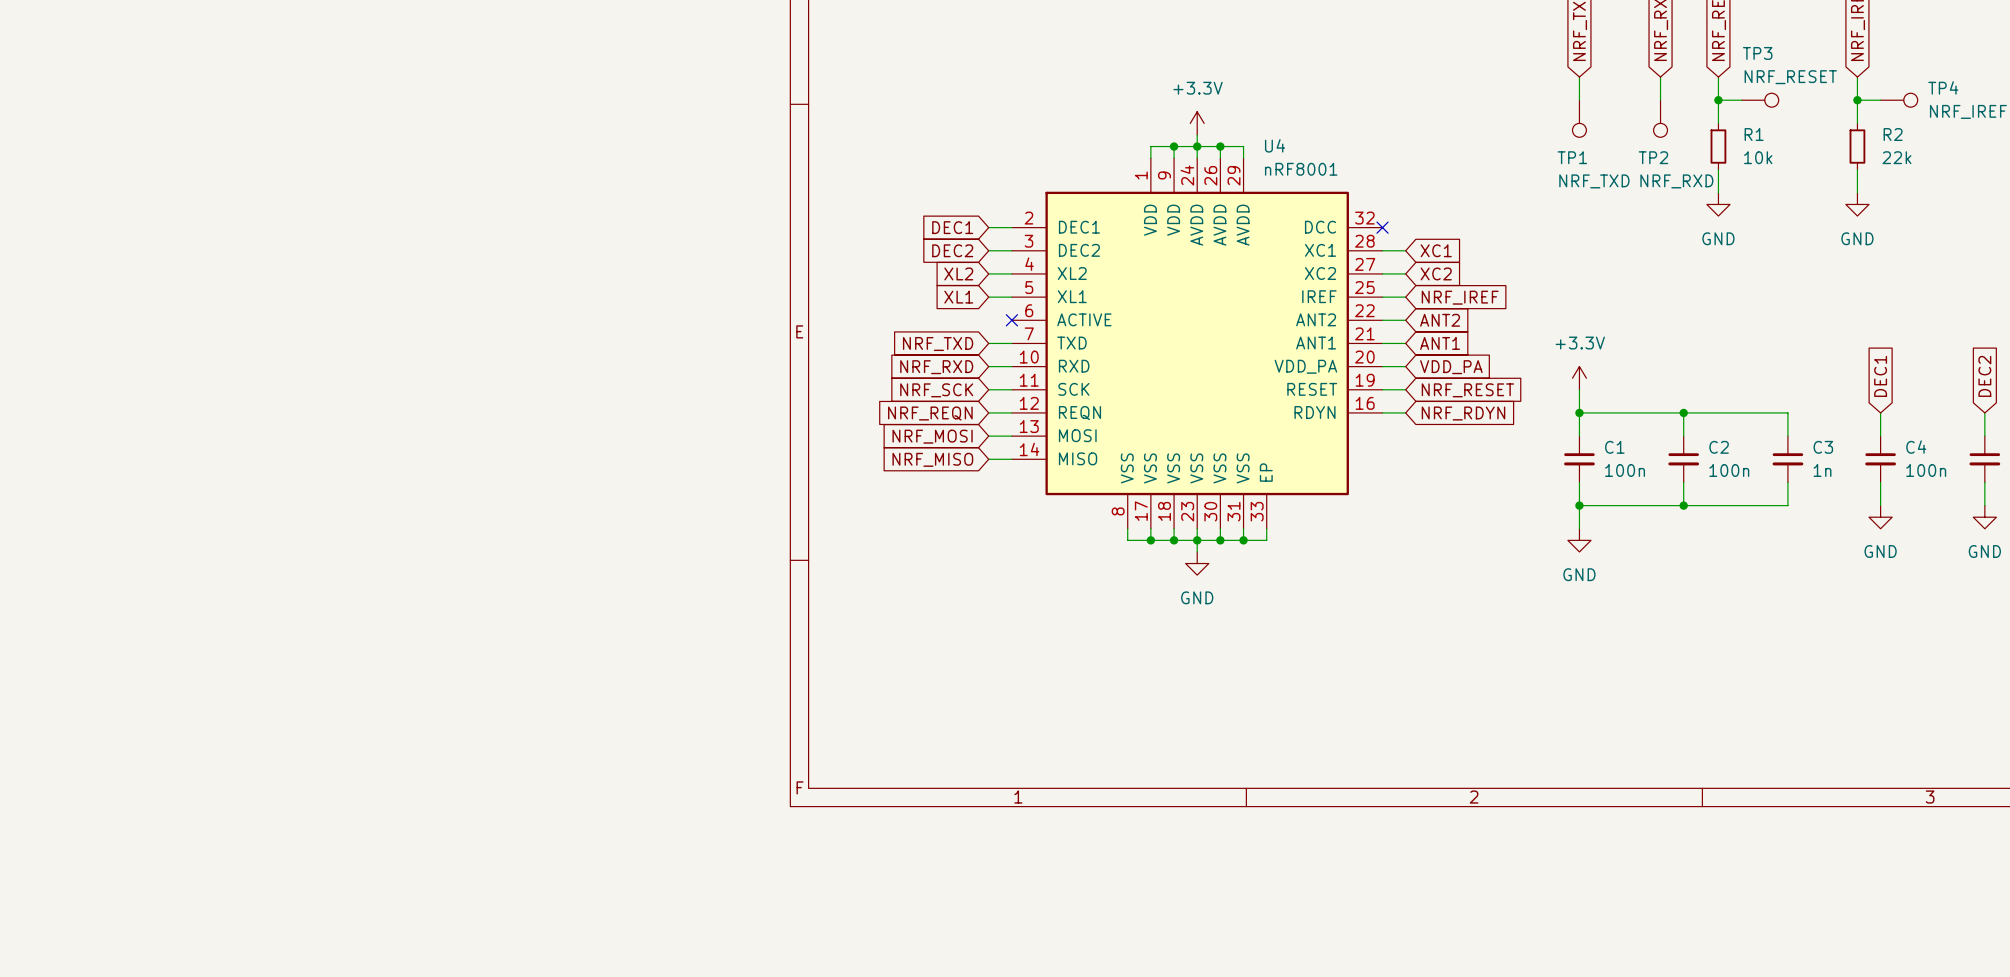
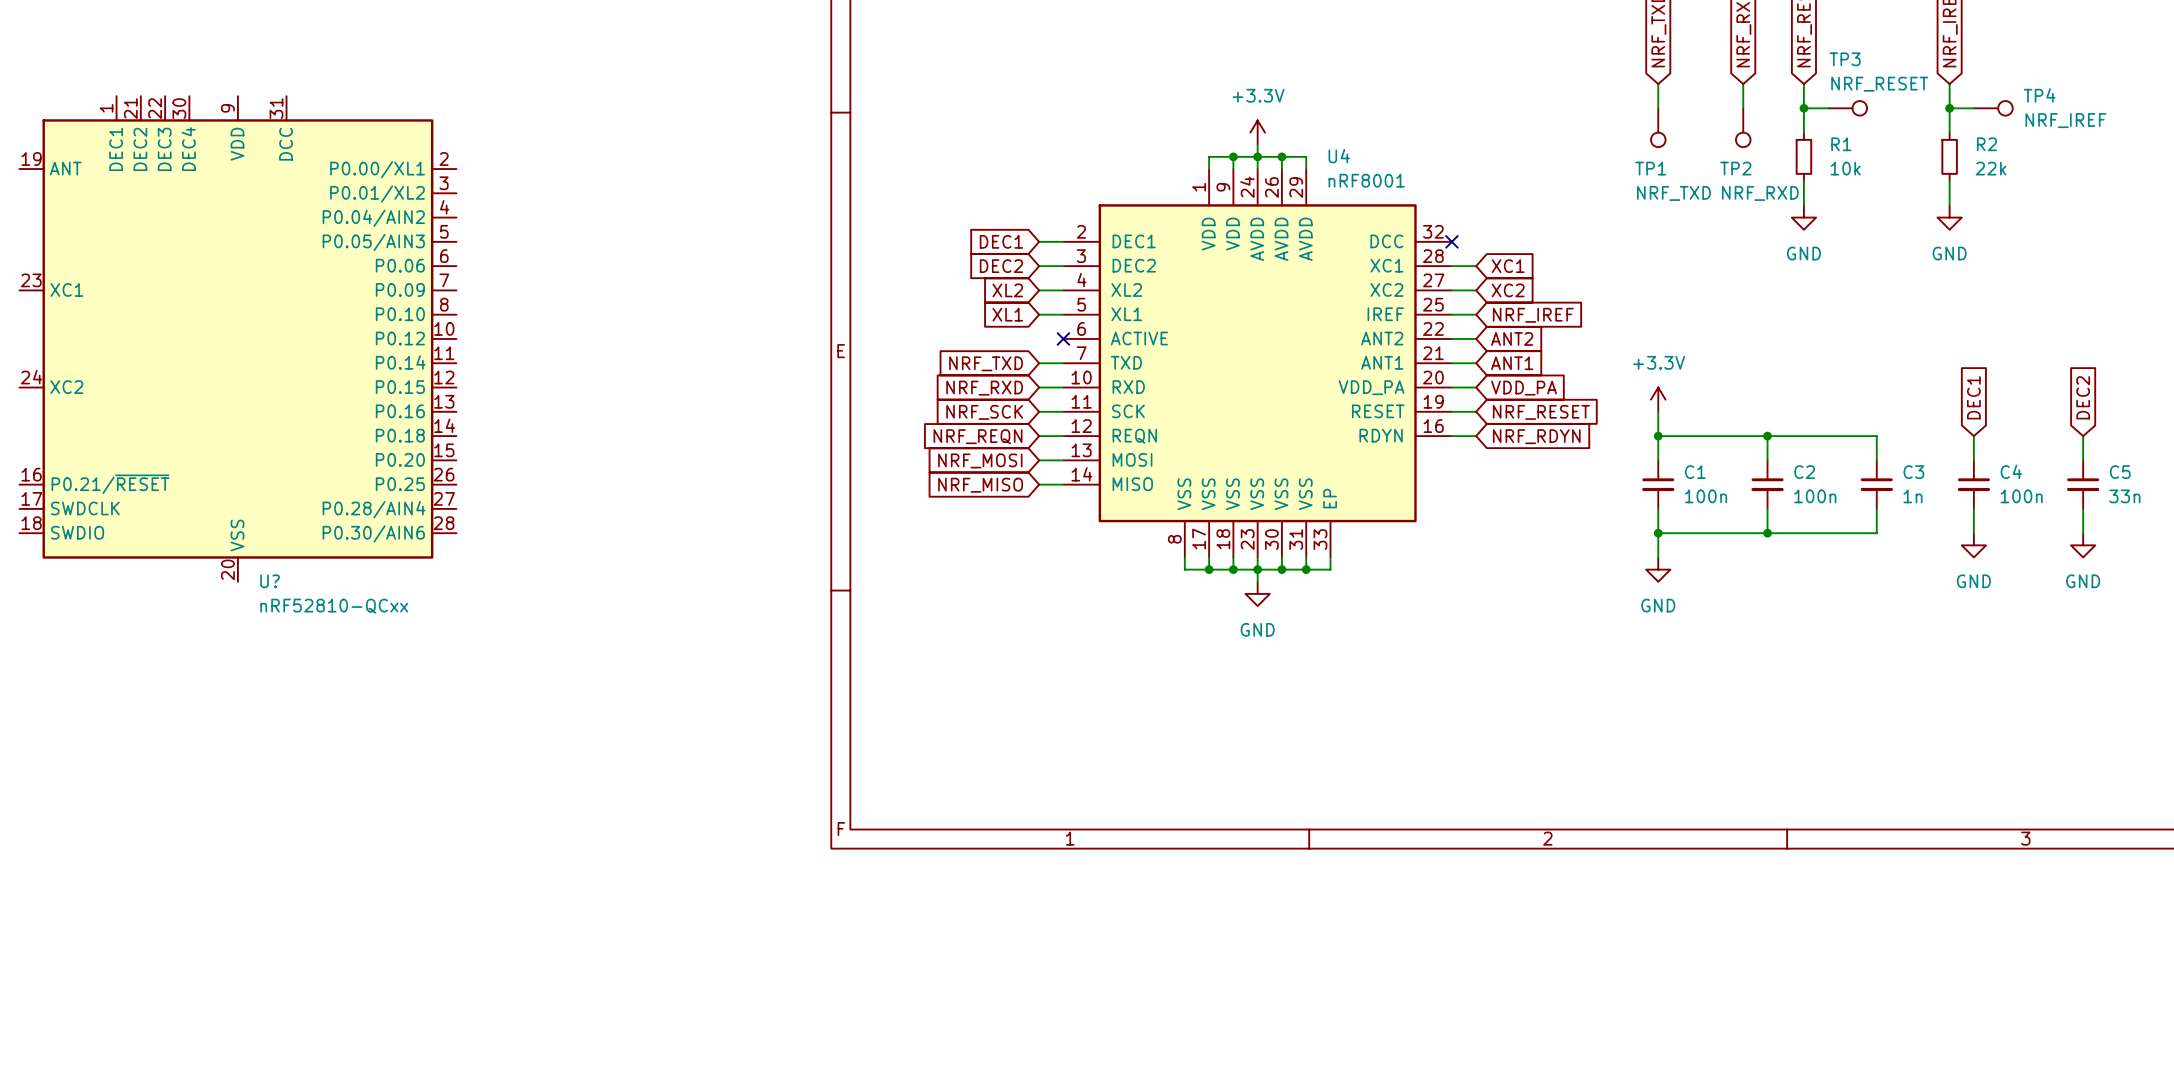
U?: none -> nRF52810-QCxx (237, 338)

